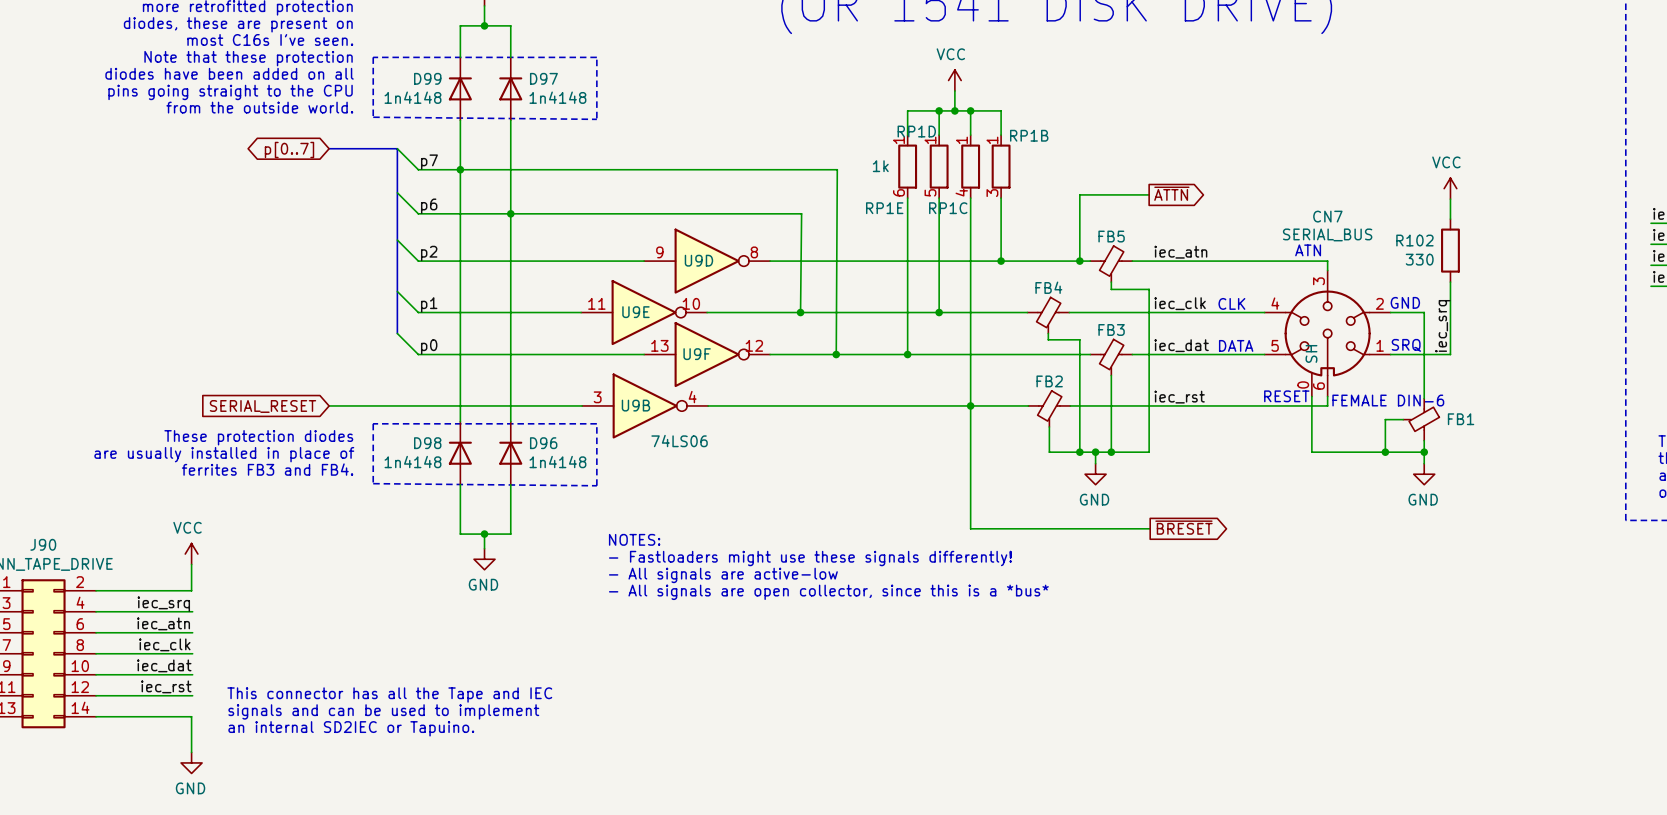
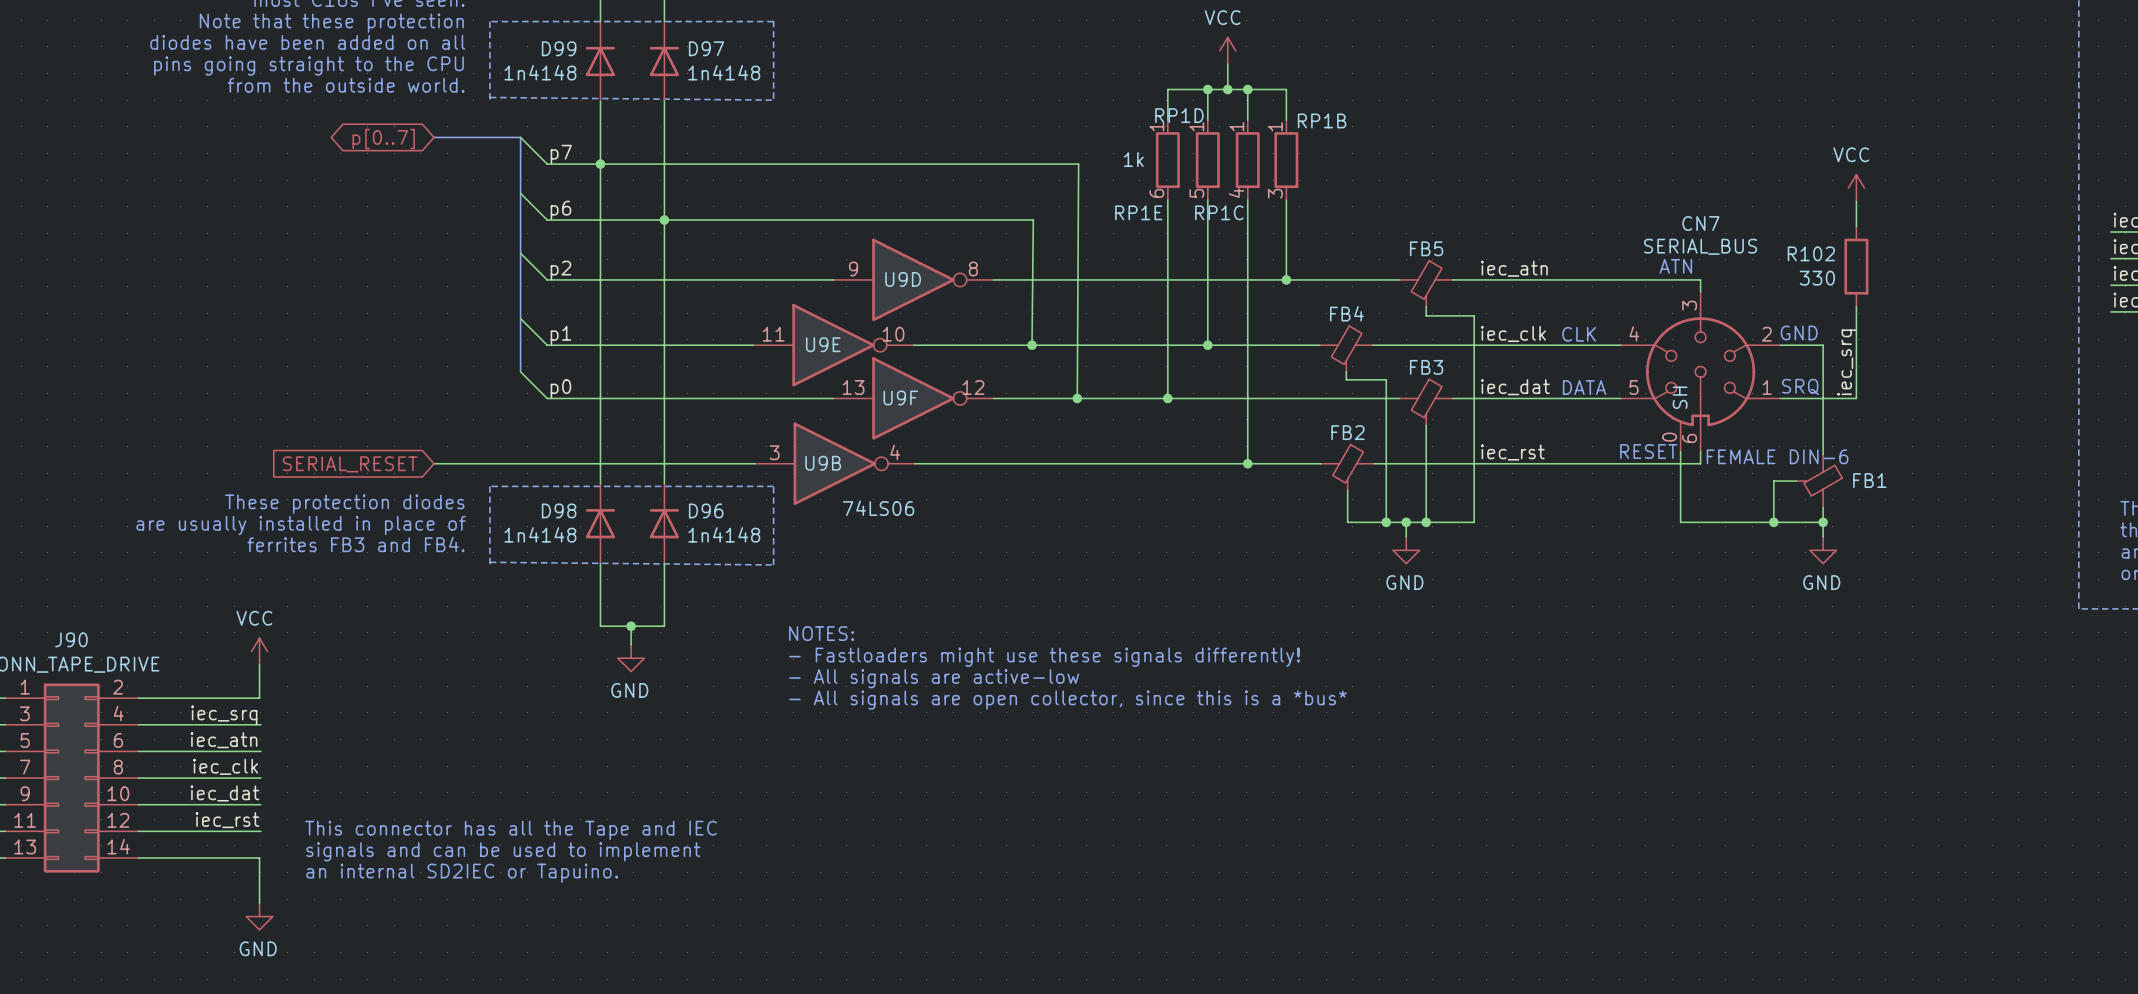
global label: ~{ATTN} (1171, 193) -> none
wire: (1149, 194) (1079, 194) (1079, 261) -> none
junction: (1079, 261) -> none
wire: (970, 405) (970, 528) (1150, 528) -> none
global label: ~{BRESET} (1183, 527) -> none

